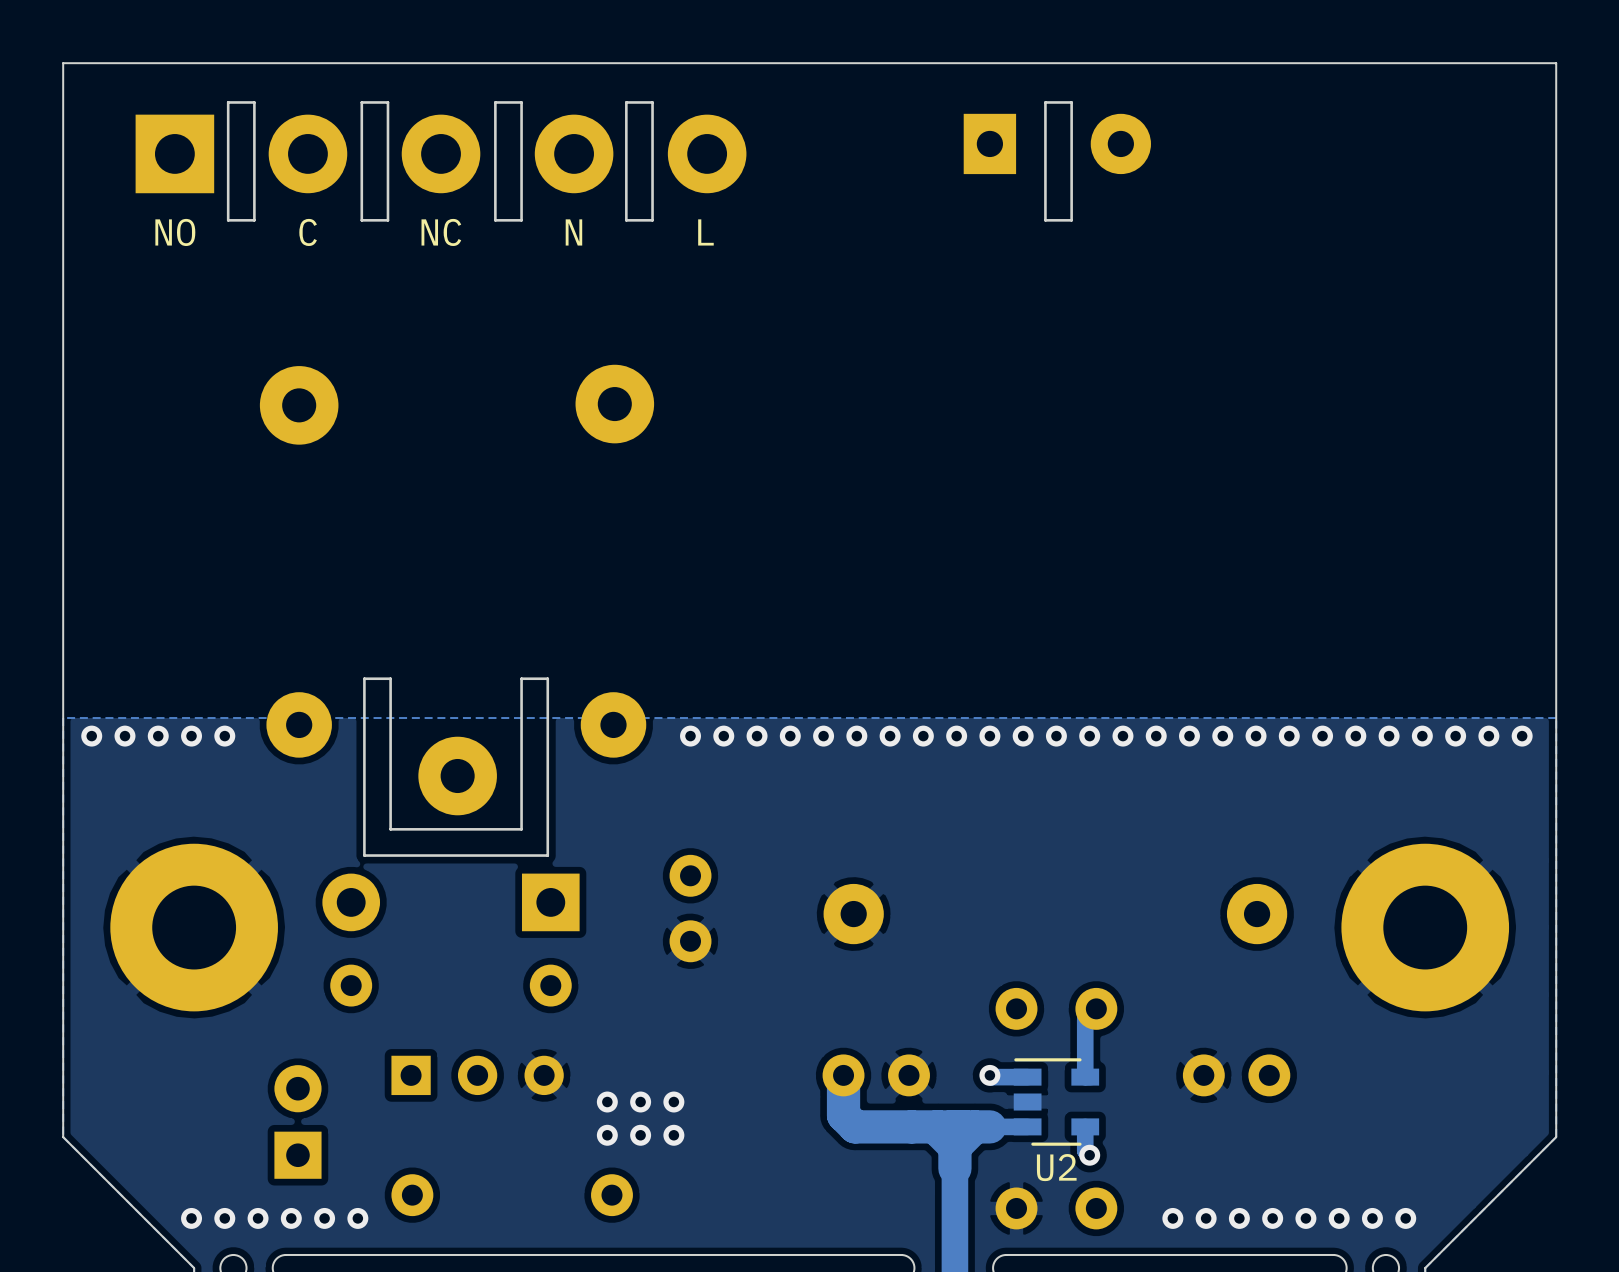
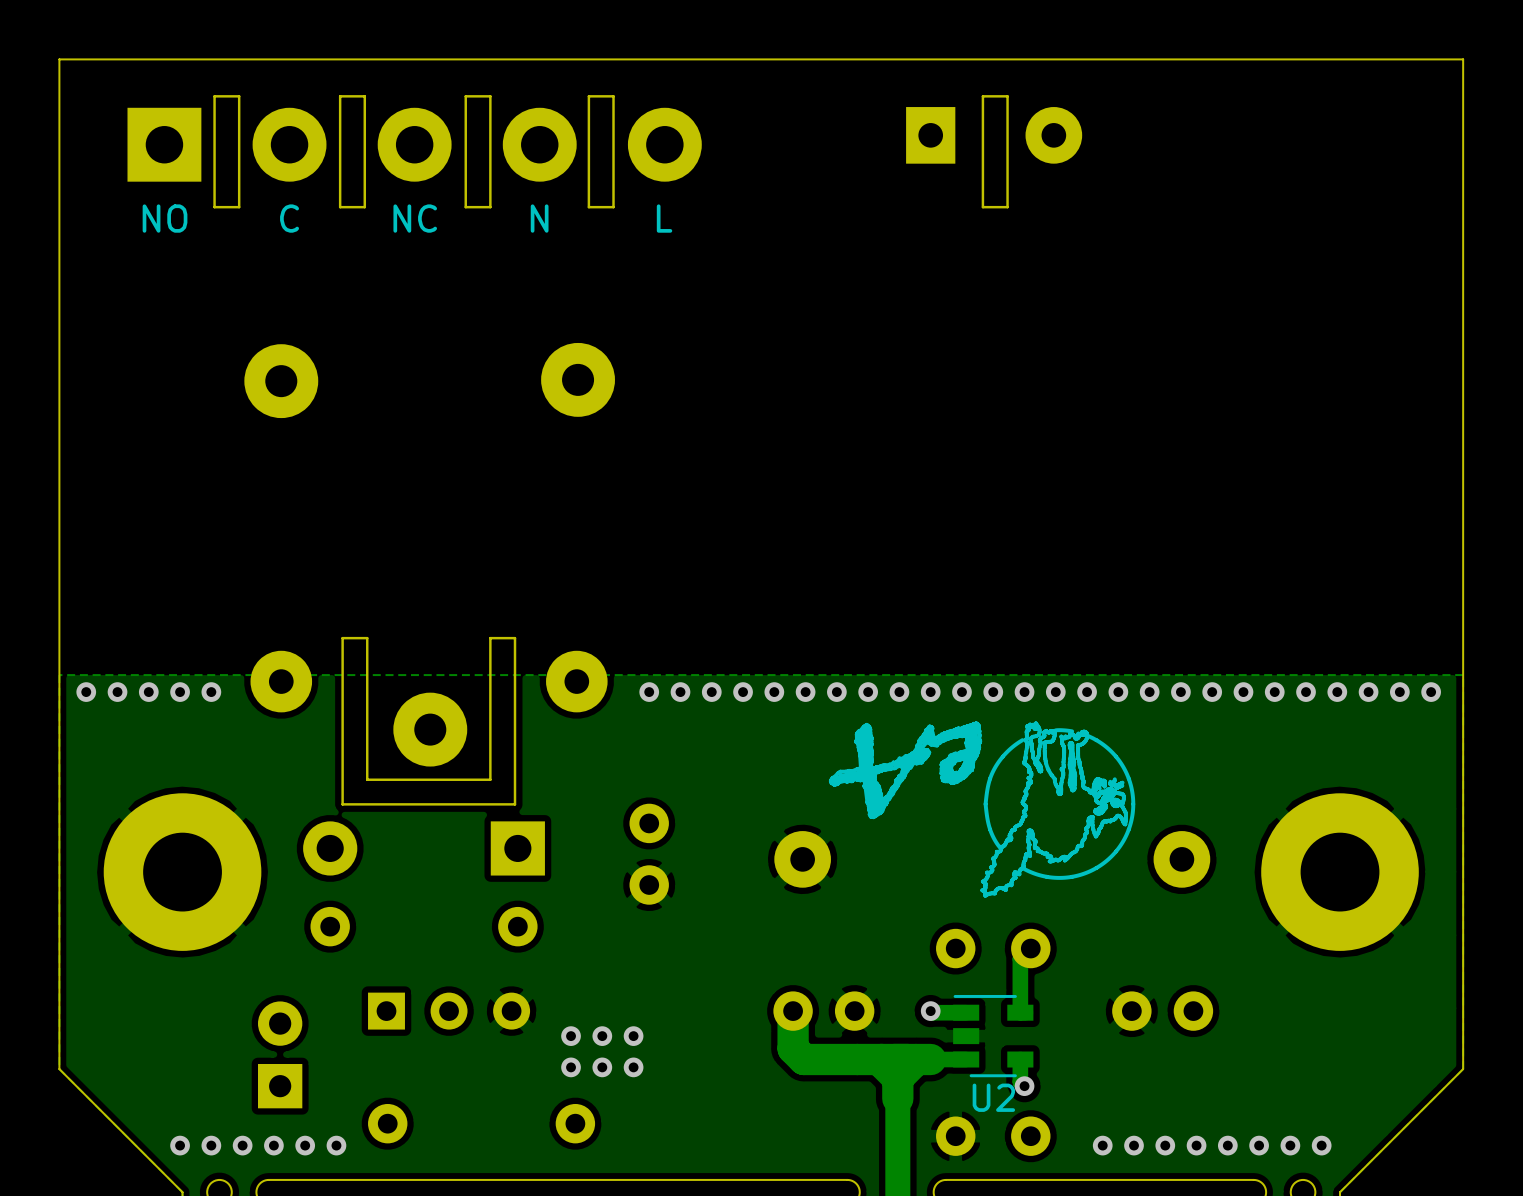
drawing: none -> [828, 721, 1136, 898]

